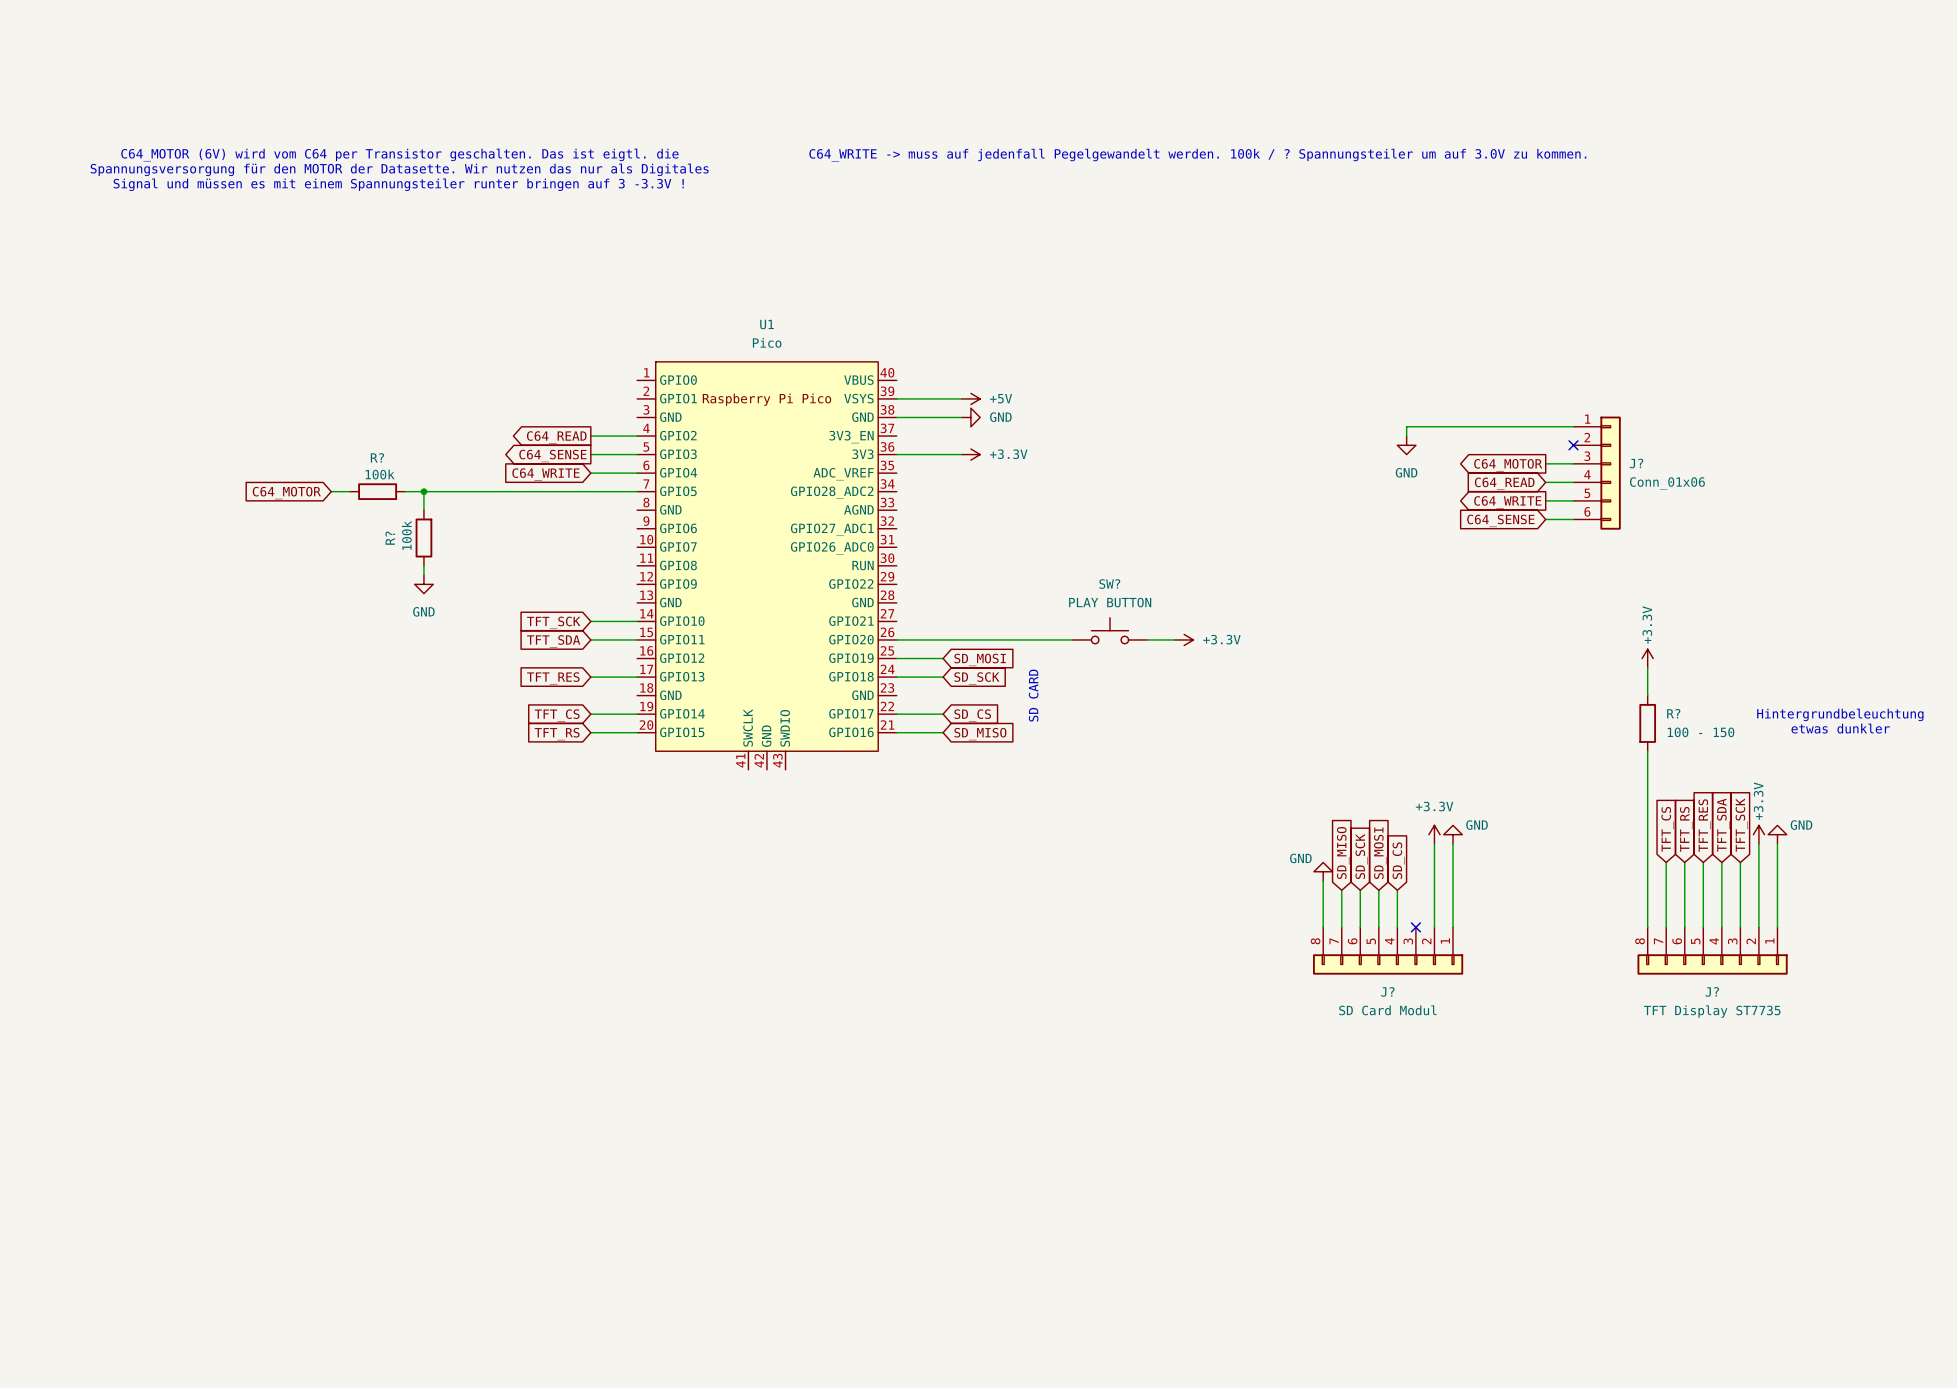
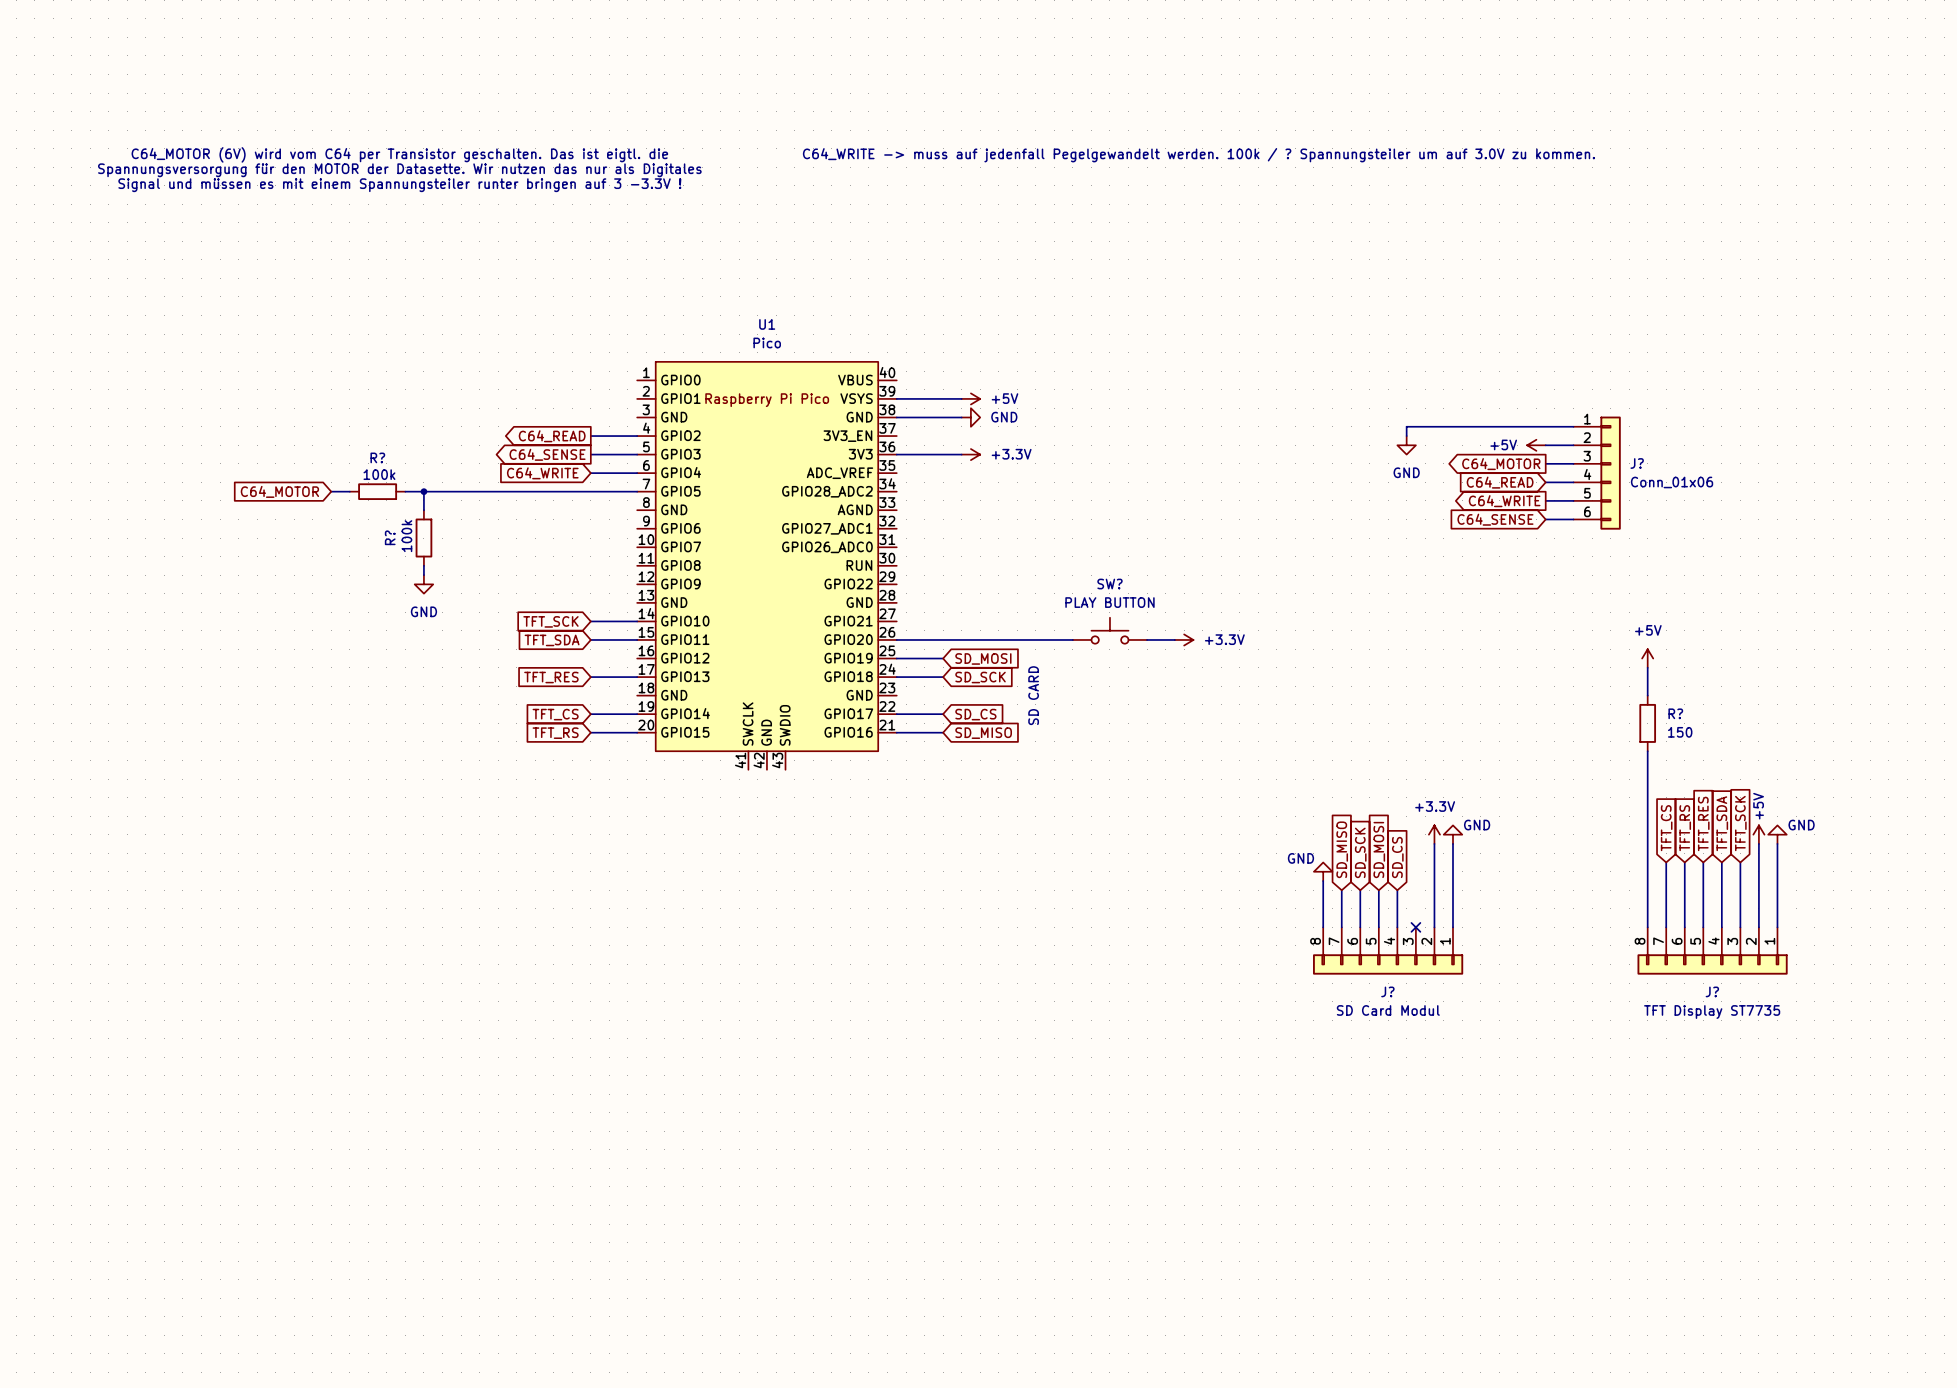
power symbol: none -> +5V (1536, 445)
wire: none -> (1545, 445) (1573, 445)
no-connect mark: (1573, 445) -> none
power symbol: +3.3V (1647, 658) -> +5V (1647, 658)
text: Hintergrundbeleuchtung (1840, 714) -> none
text: etwas dunkler (1840, 728) -> none
R? value: 100 - 150 (1701, 732) -> 150 (1680, 732)
power symbol: +3.3V (1758, 834) -> +5V (1758, 834)

